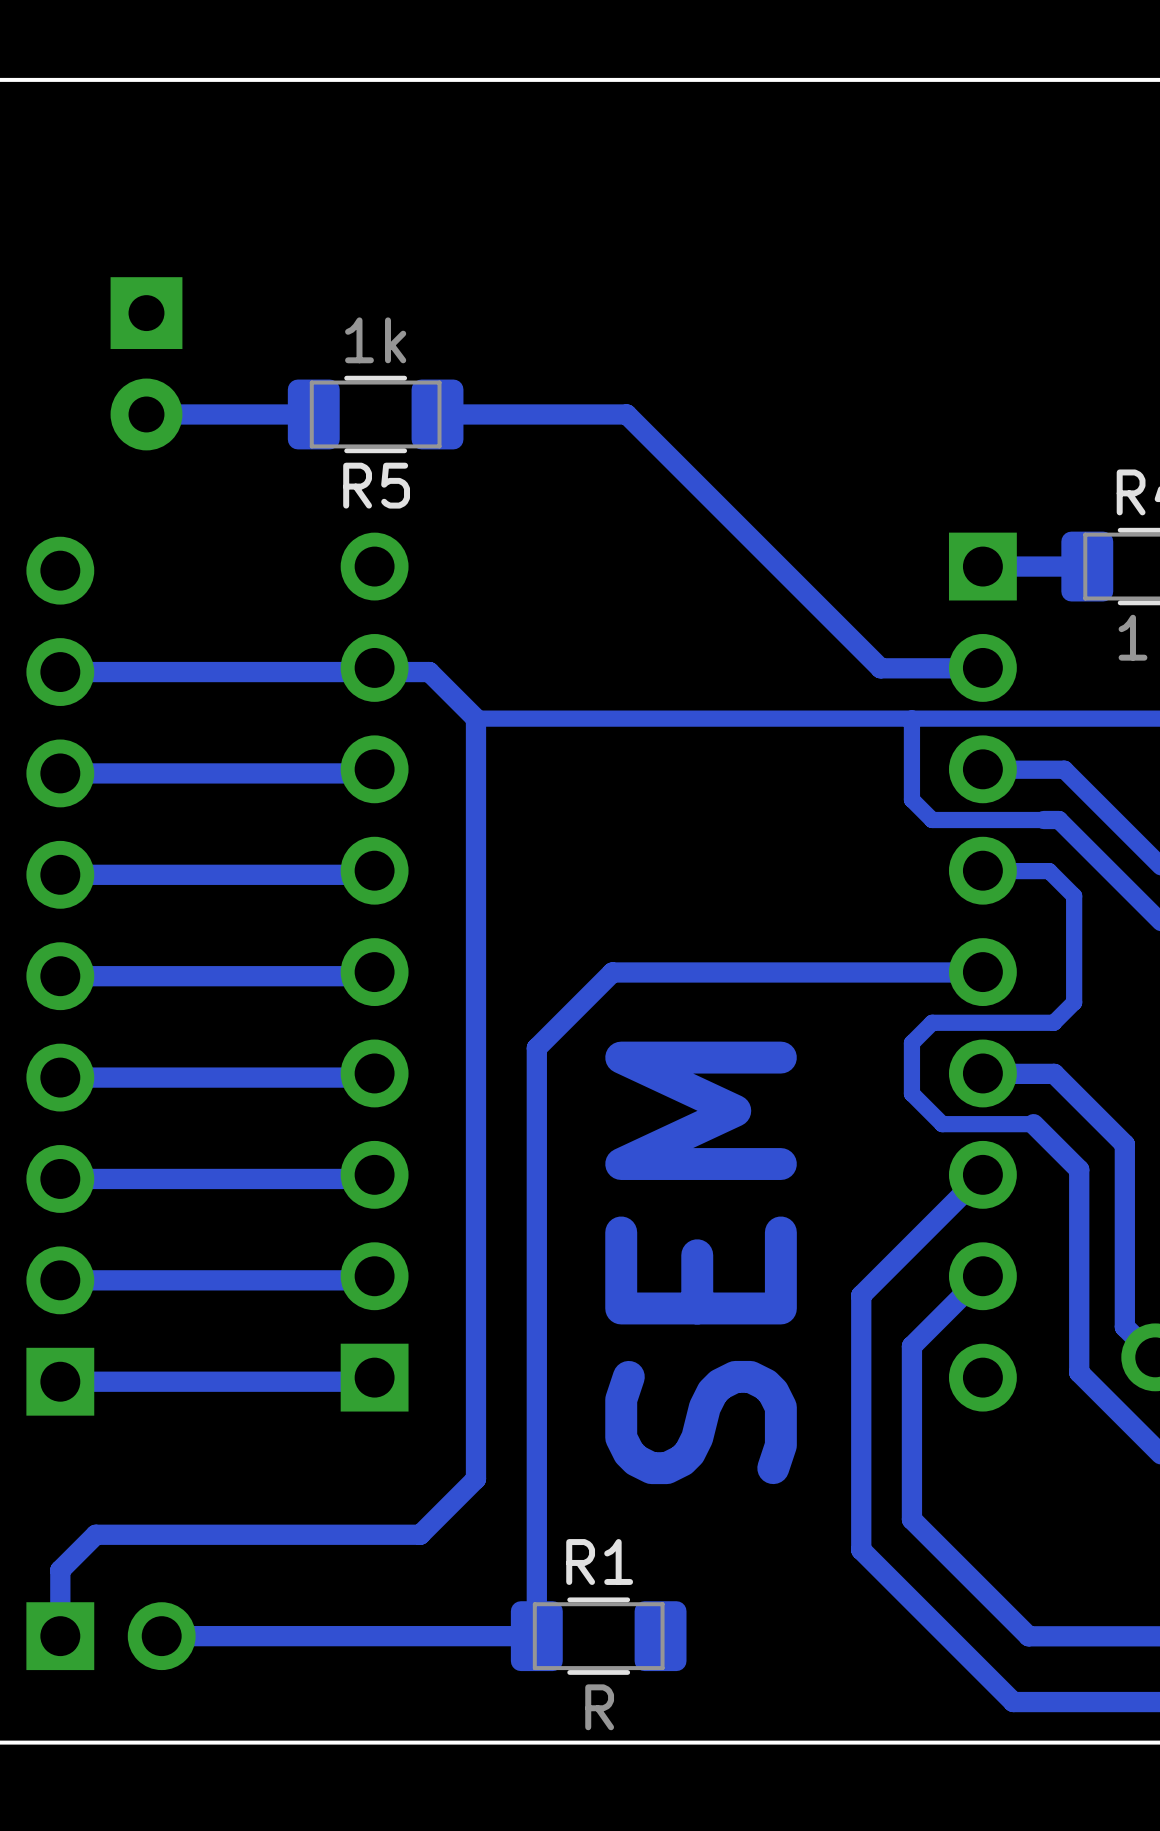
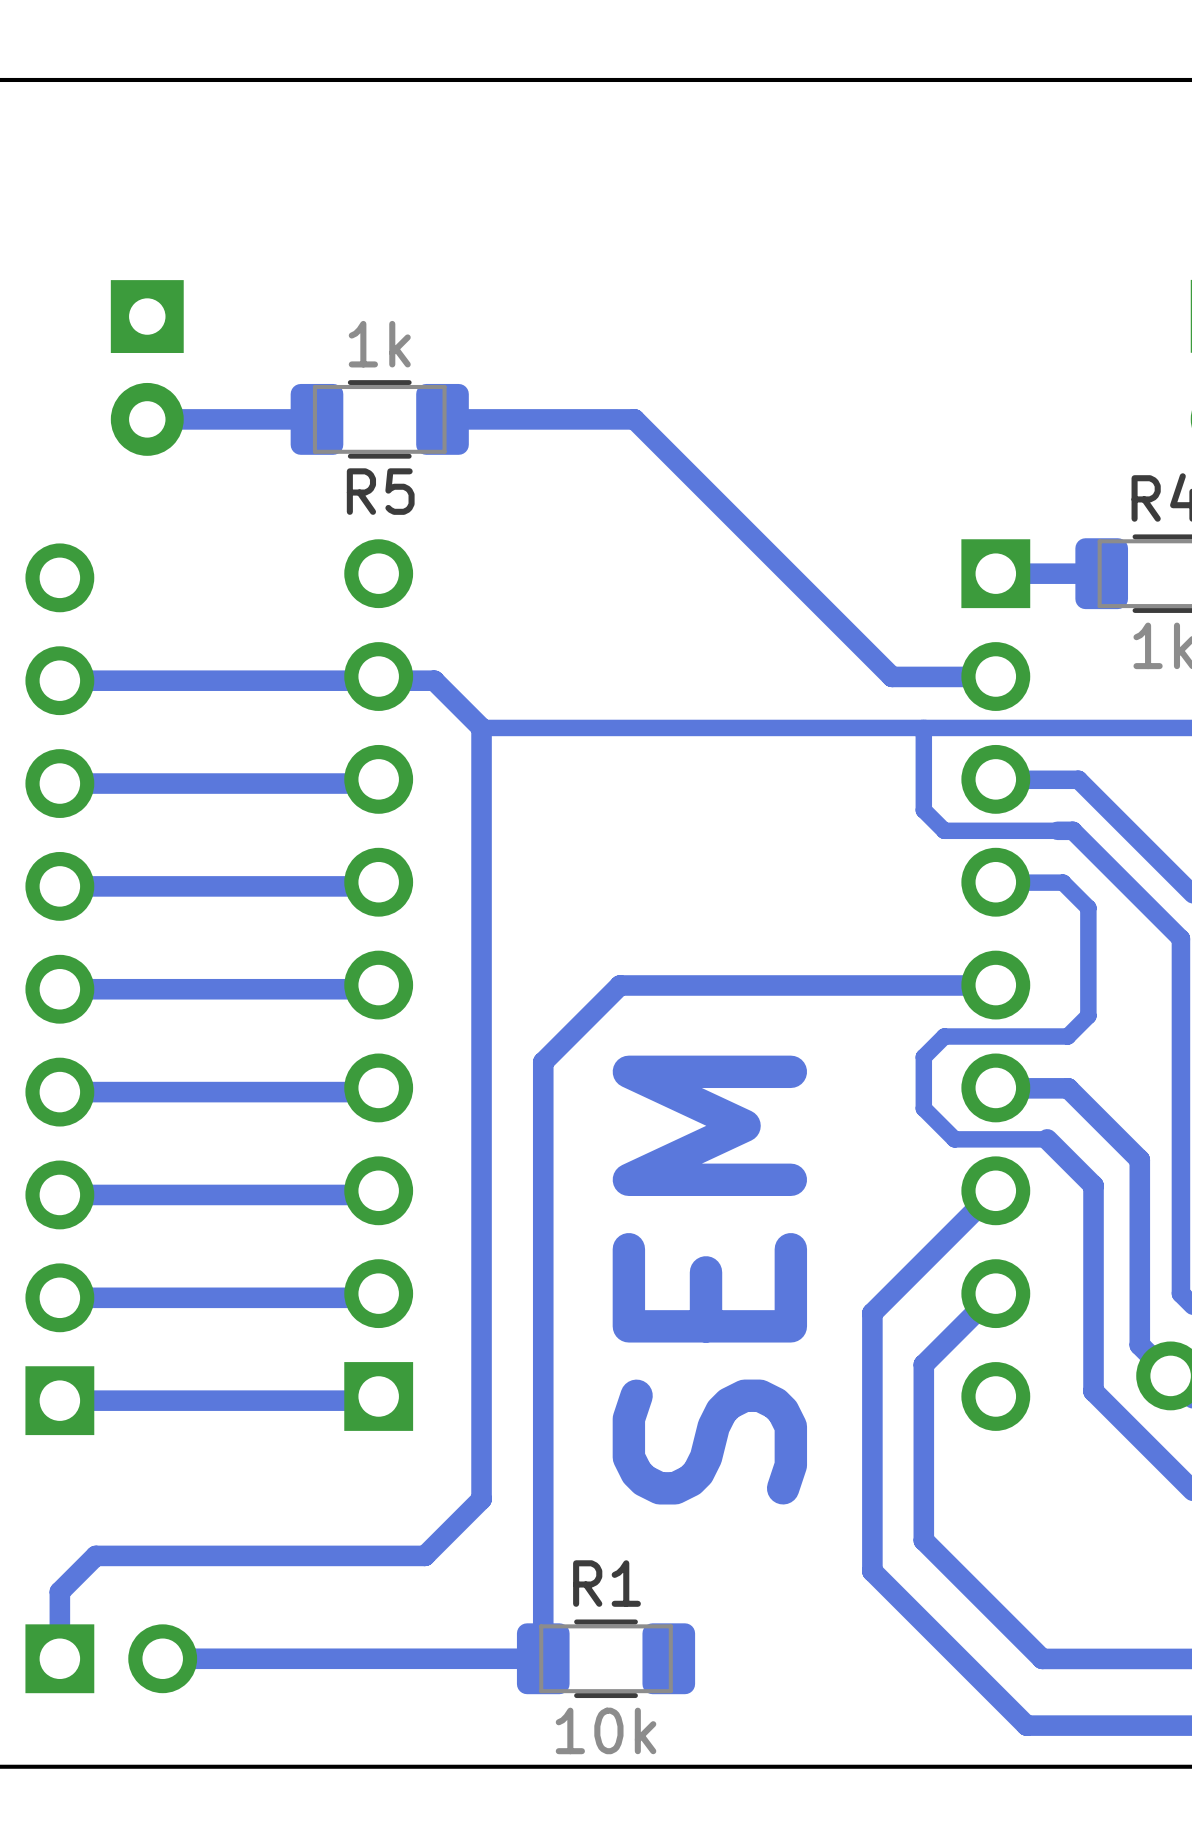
R1 value: R (599, 1707) -> 10k (606, 1730)

